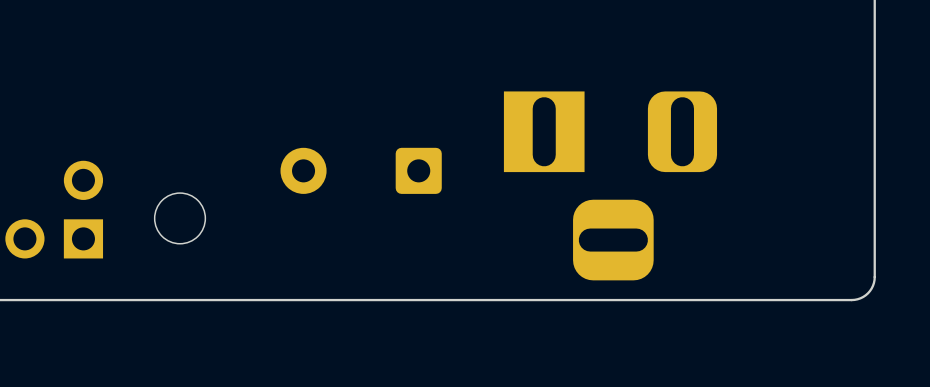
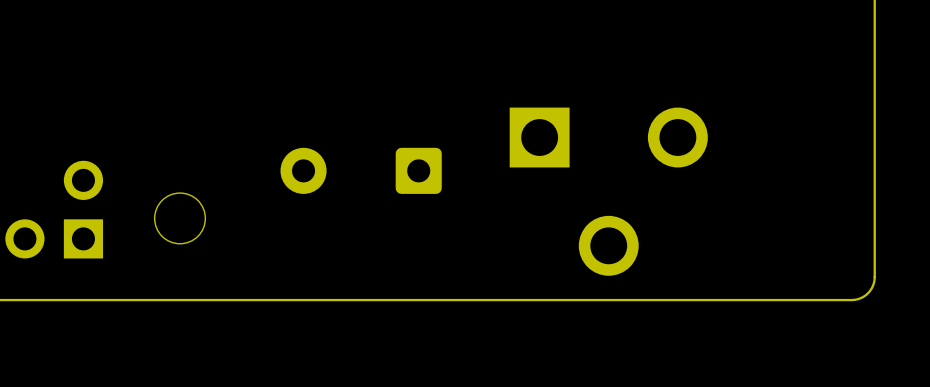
part footprint: [503, 91, 718, 281] -> [509, 107, 708, 276]

